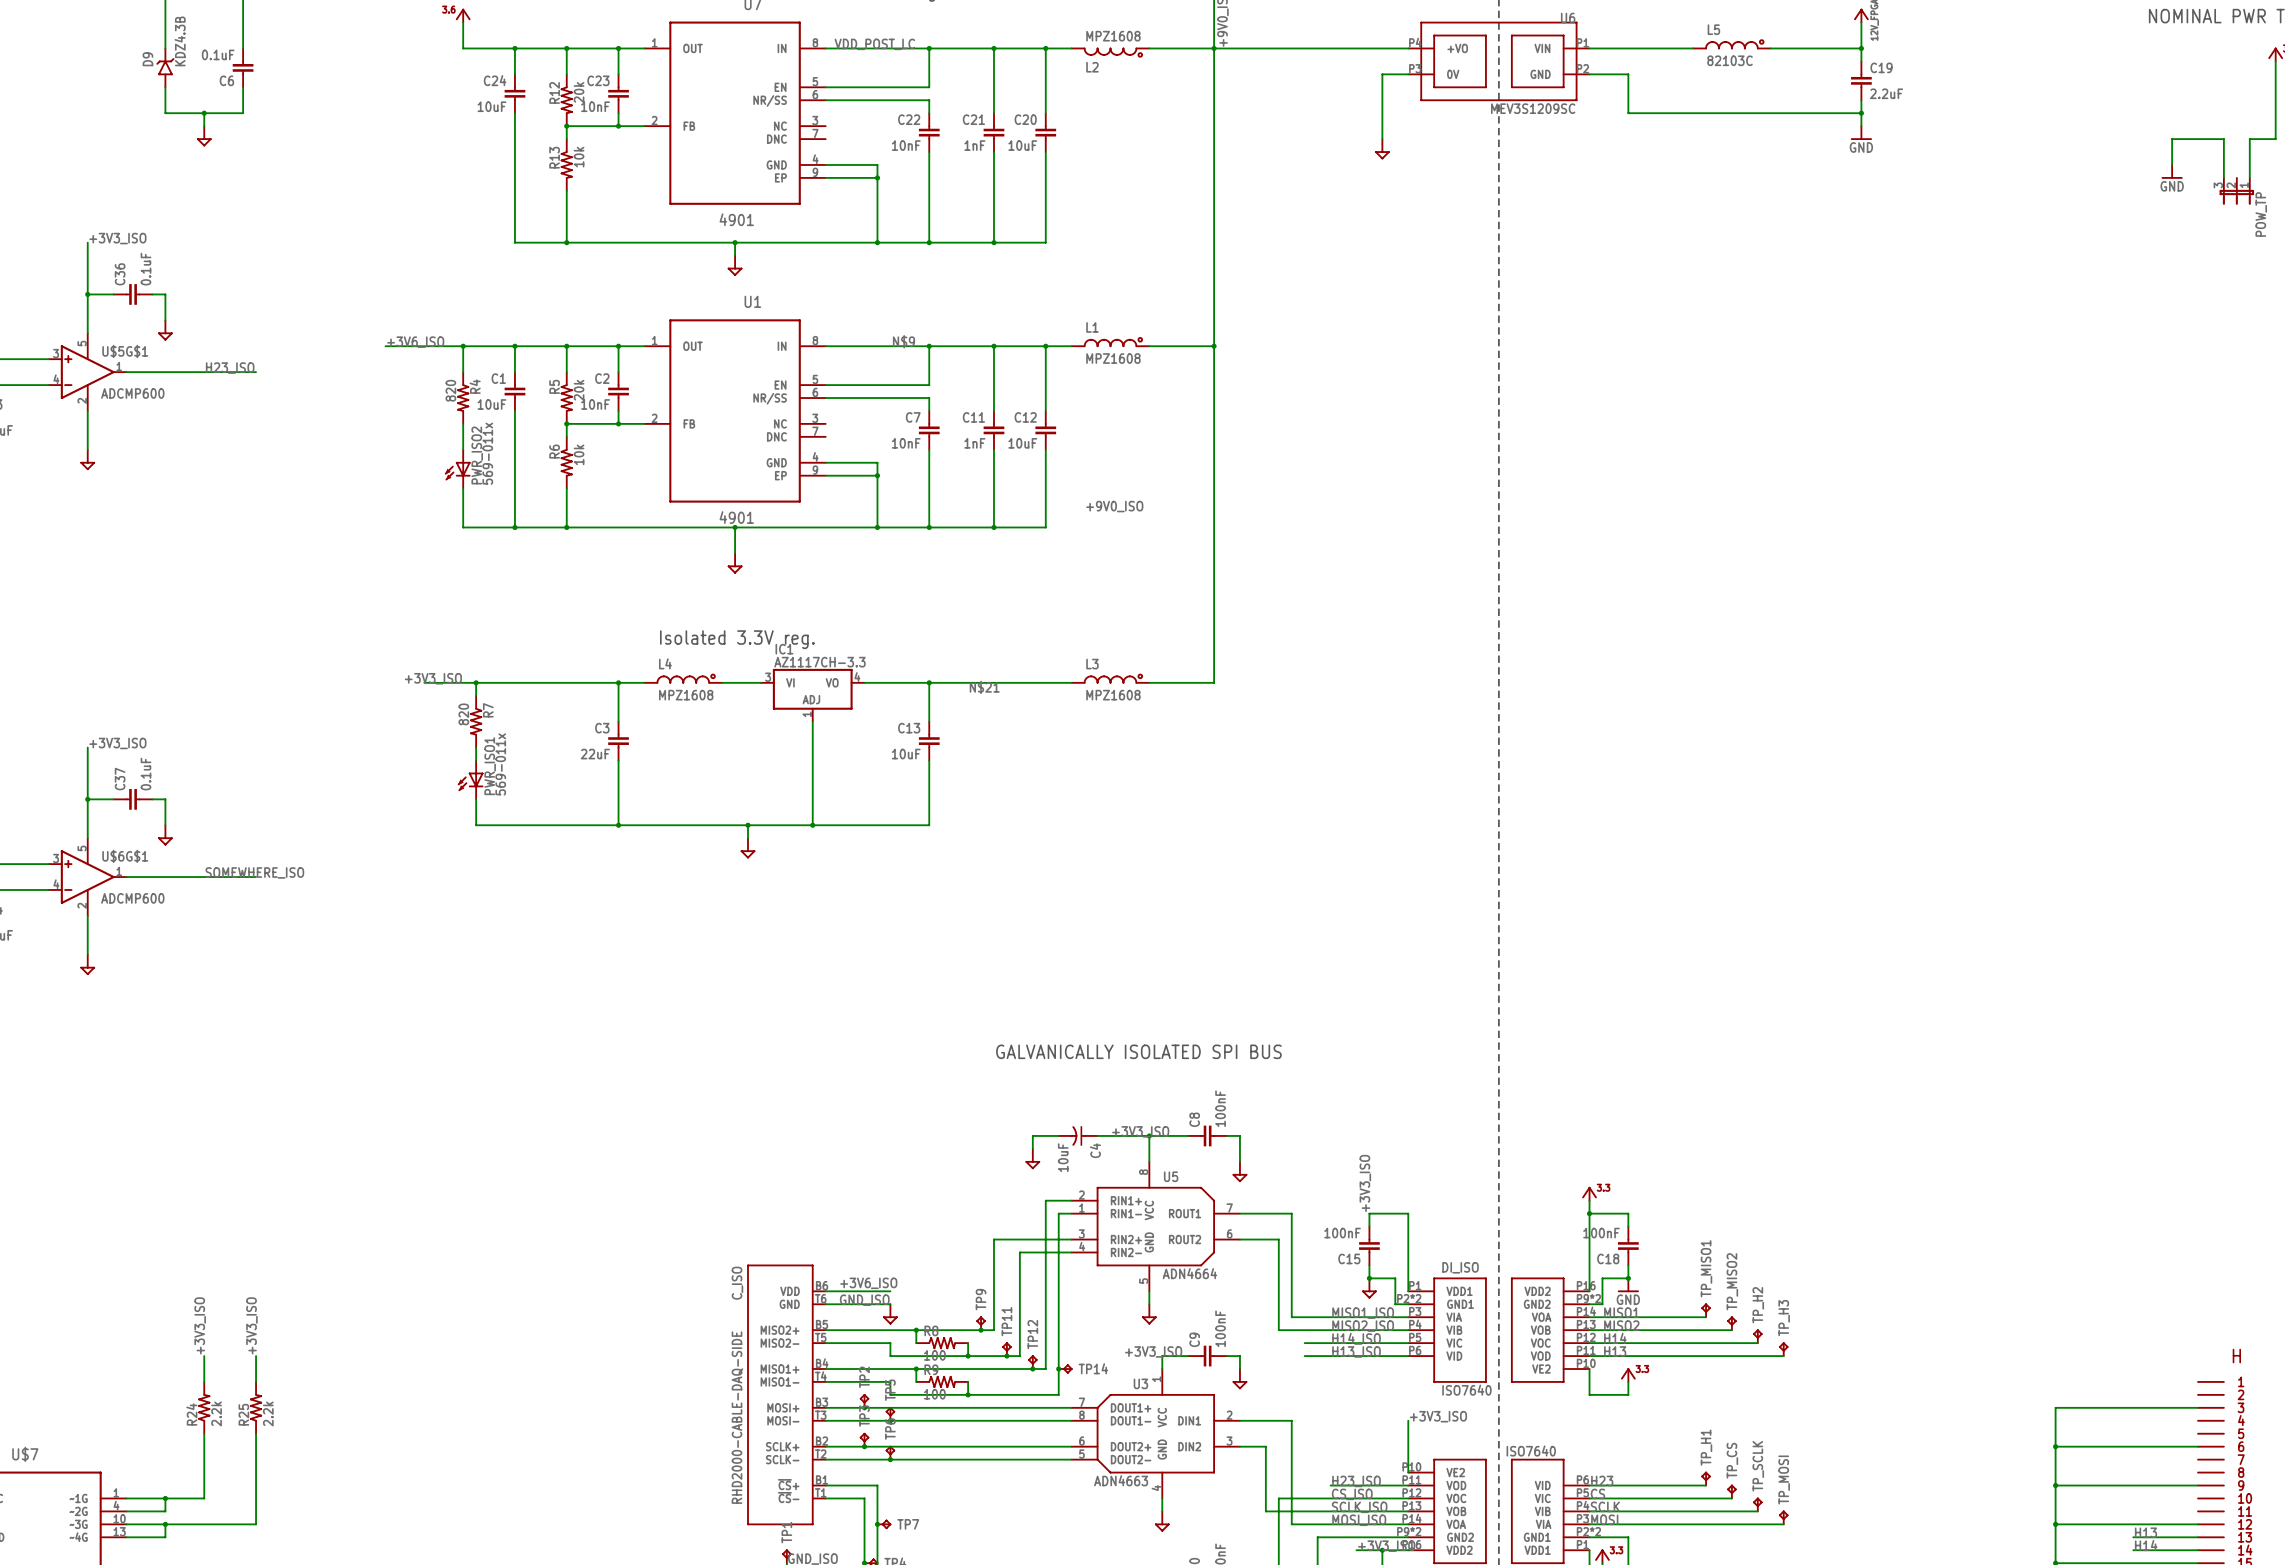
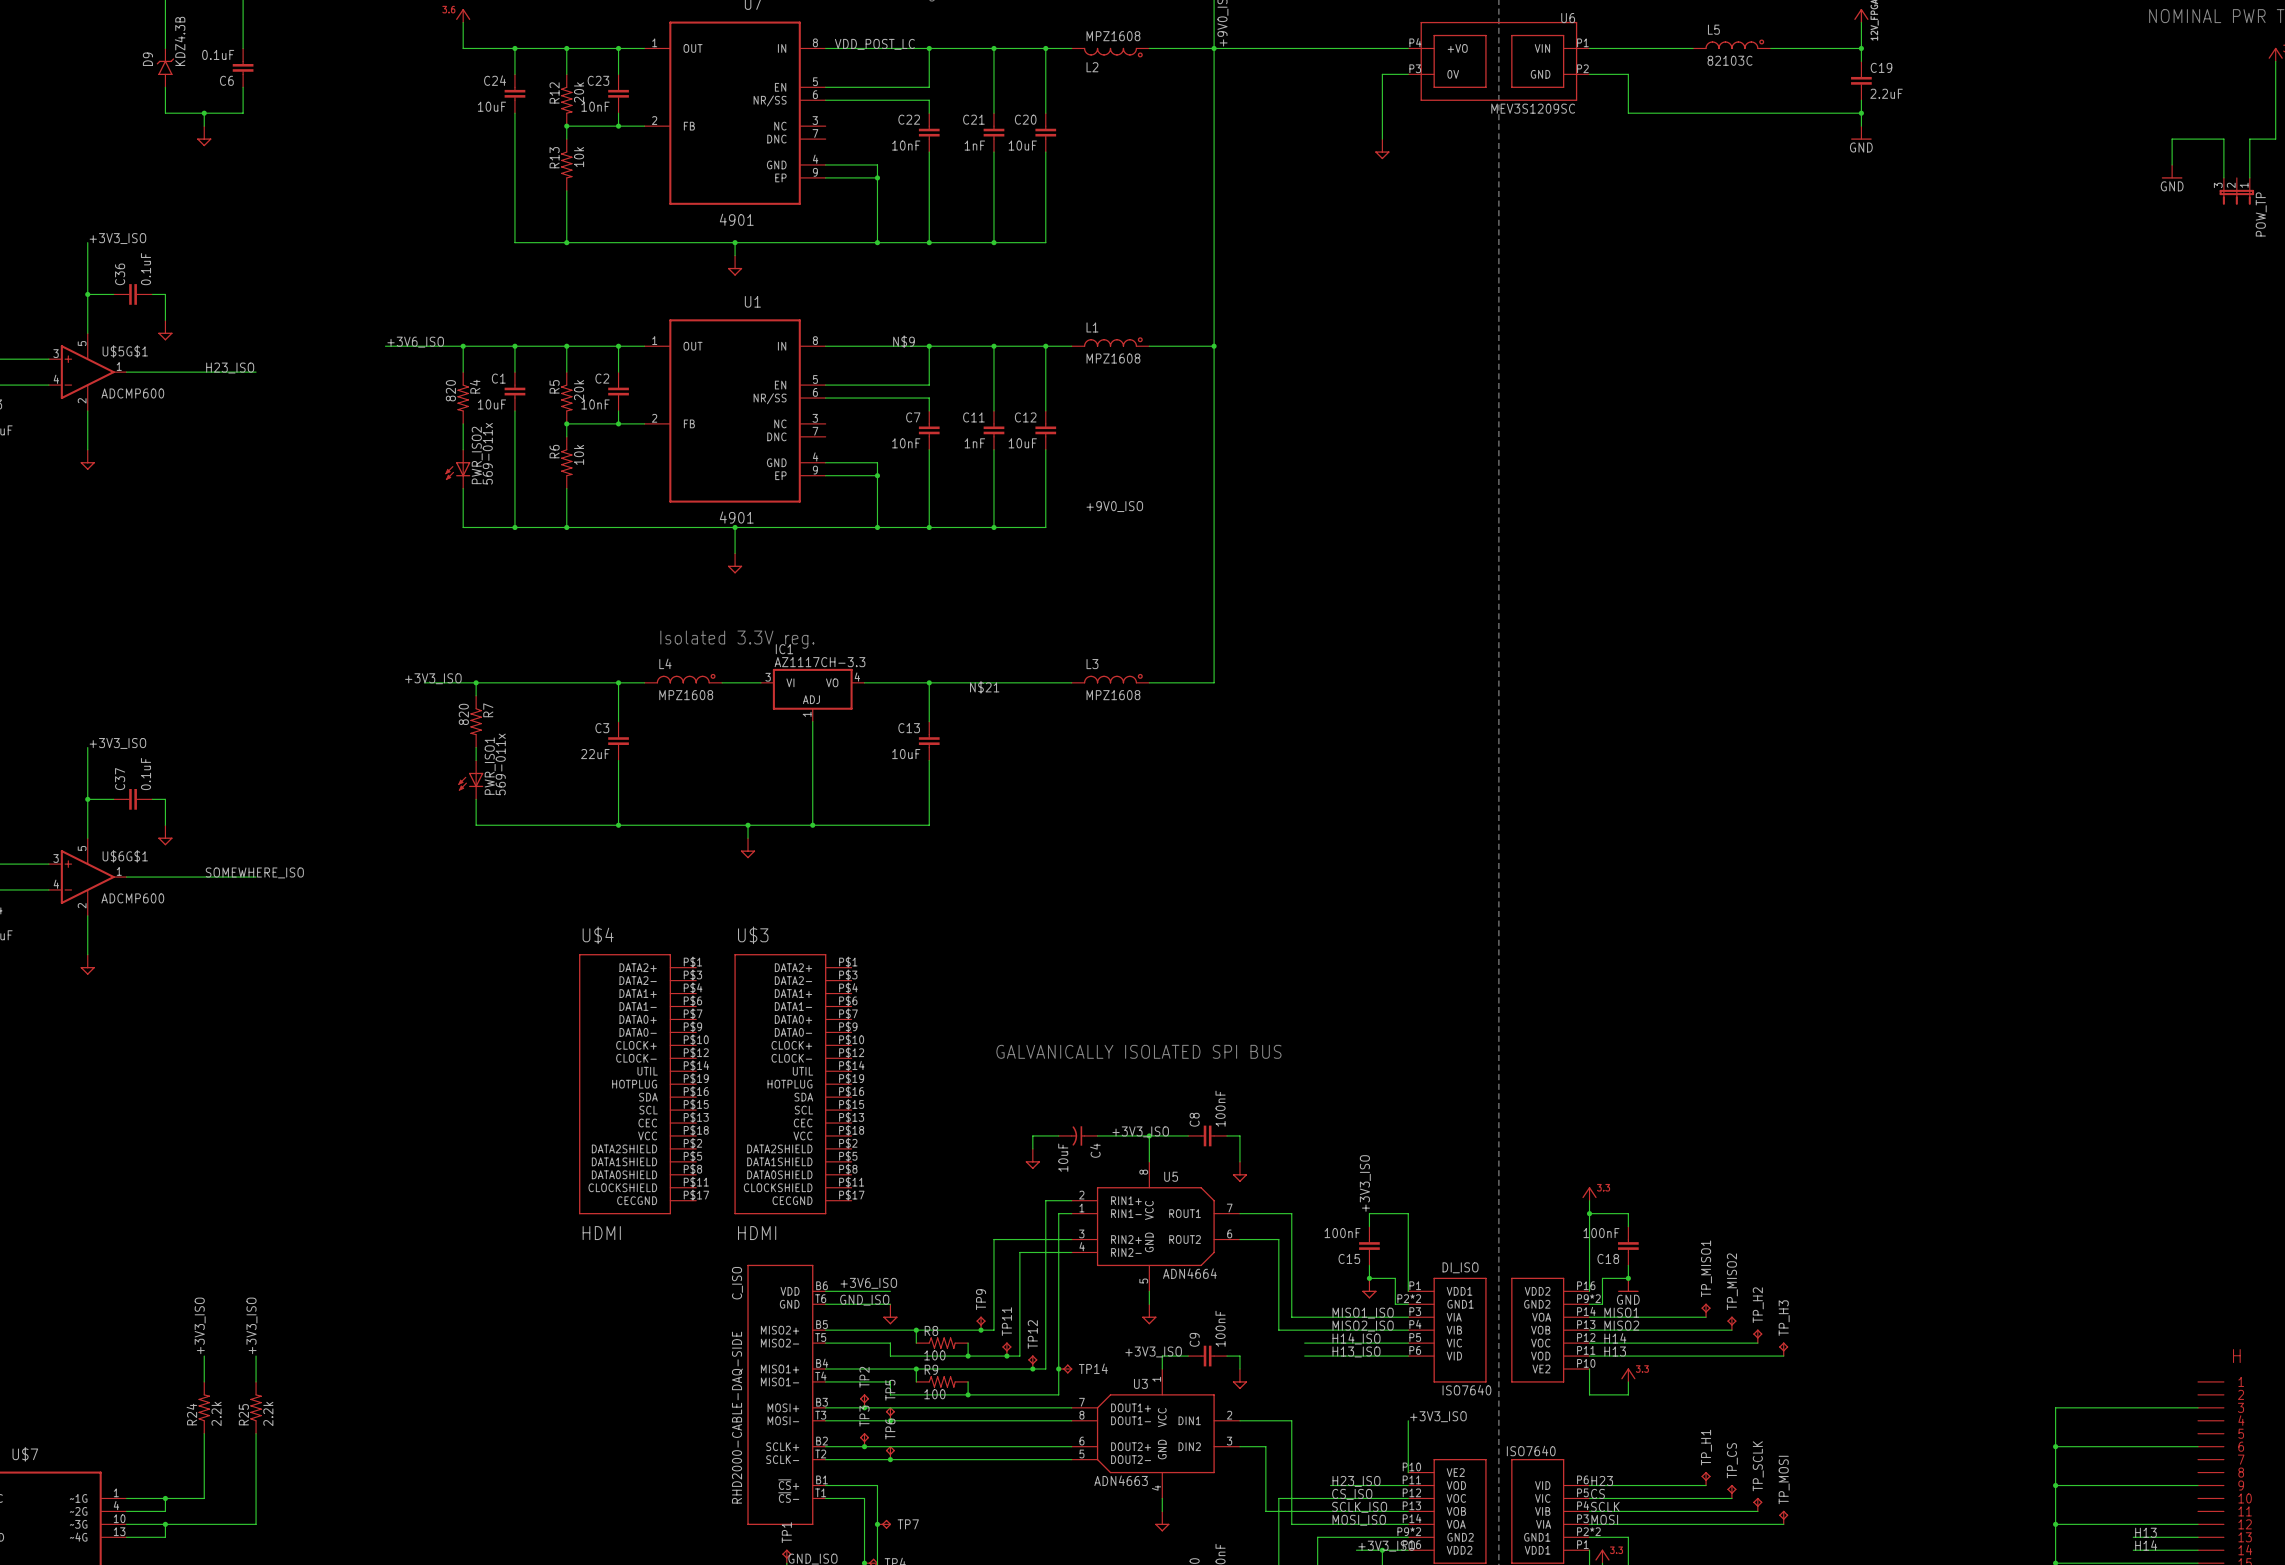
U$4: none -> HDMI (637, 1084)
U$3: none -> HDMI (792, 1084)

